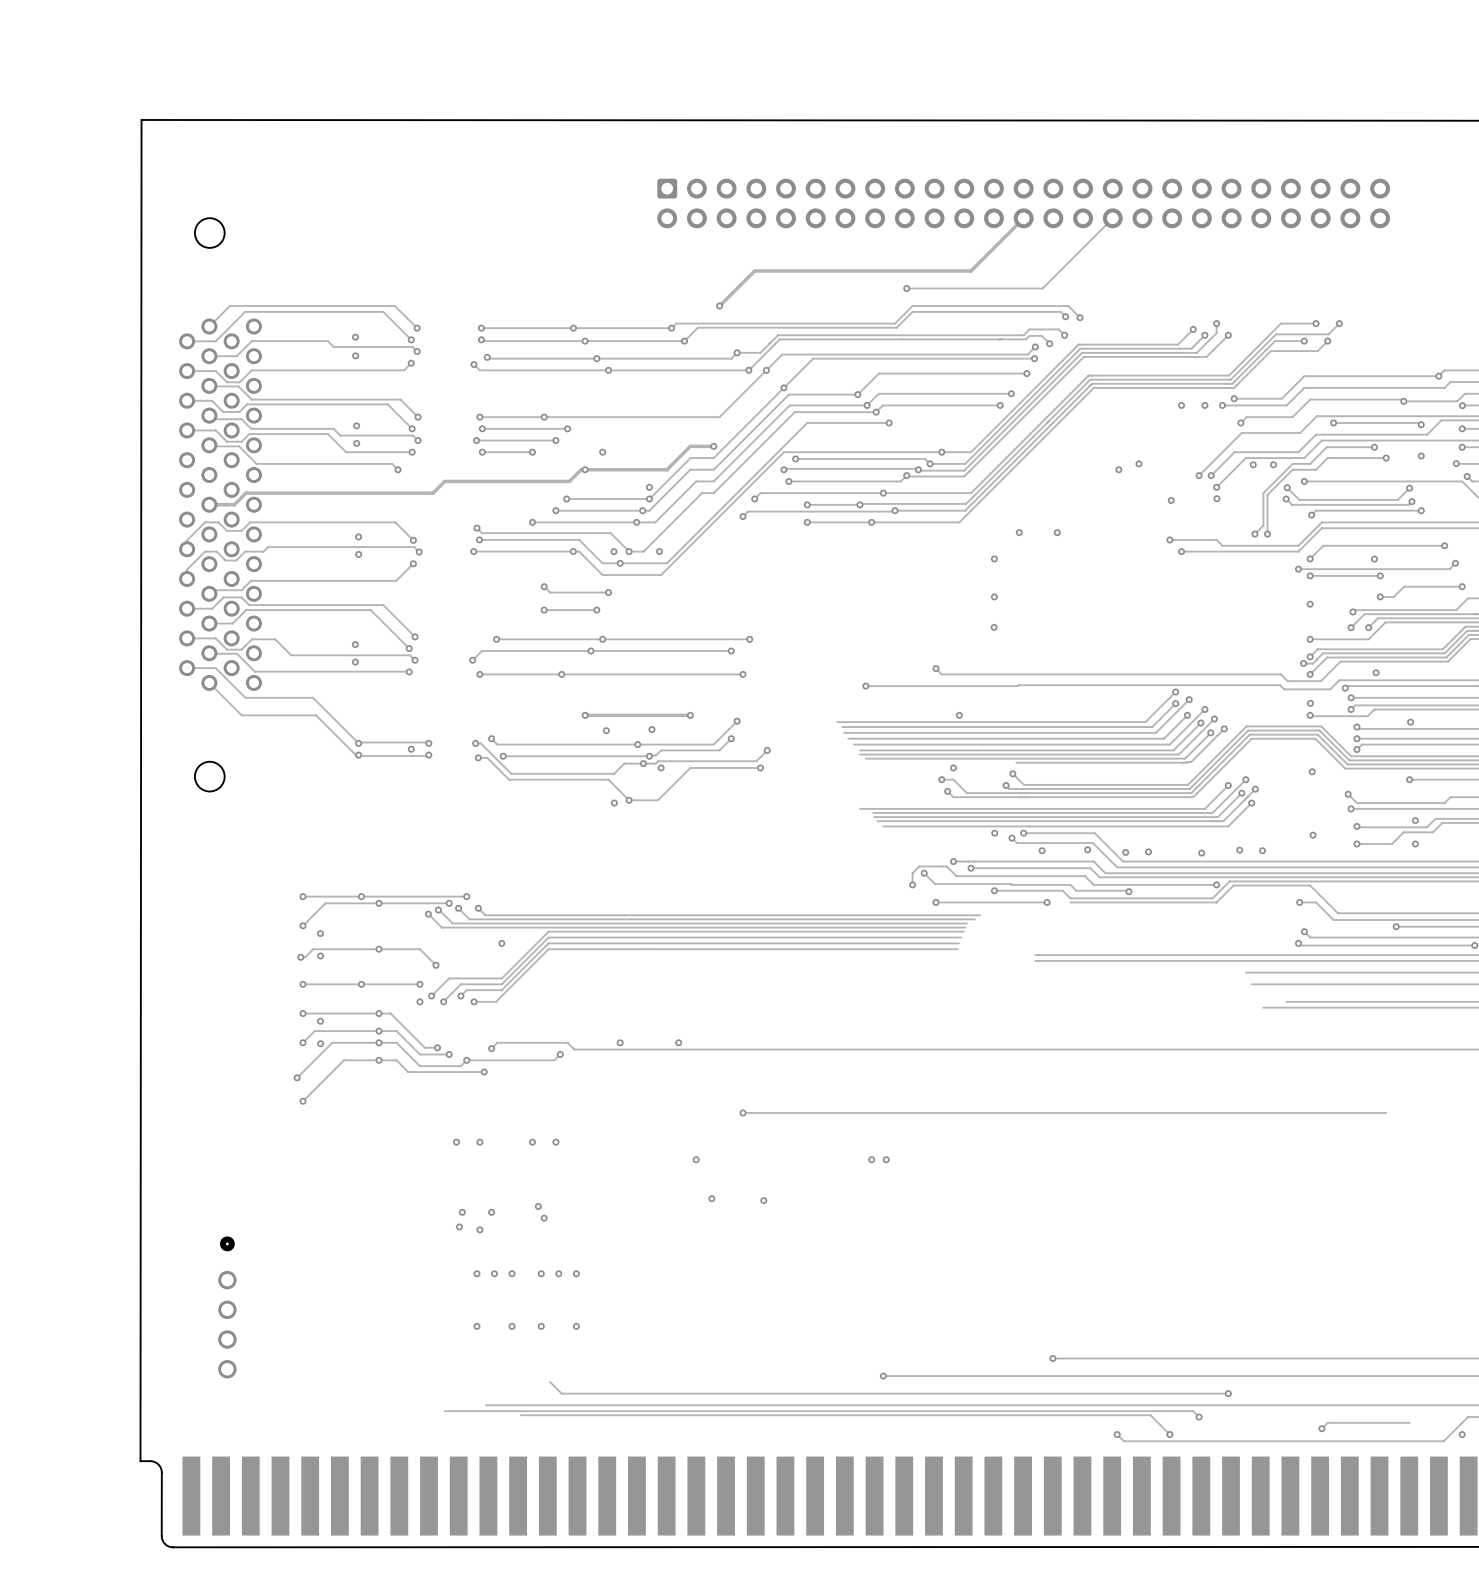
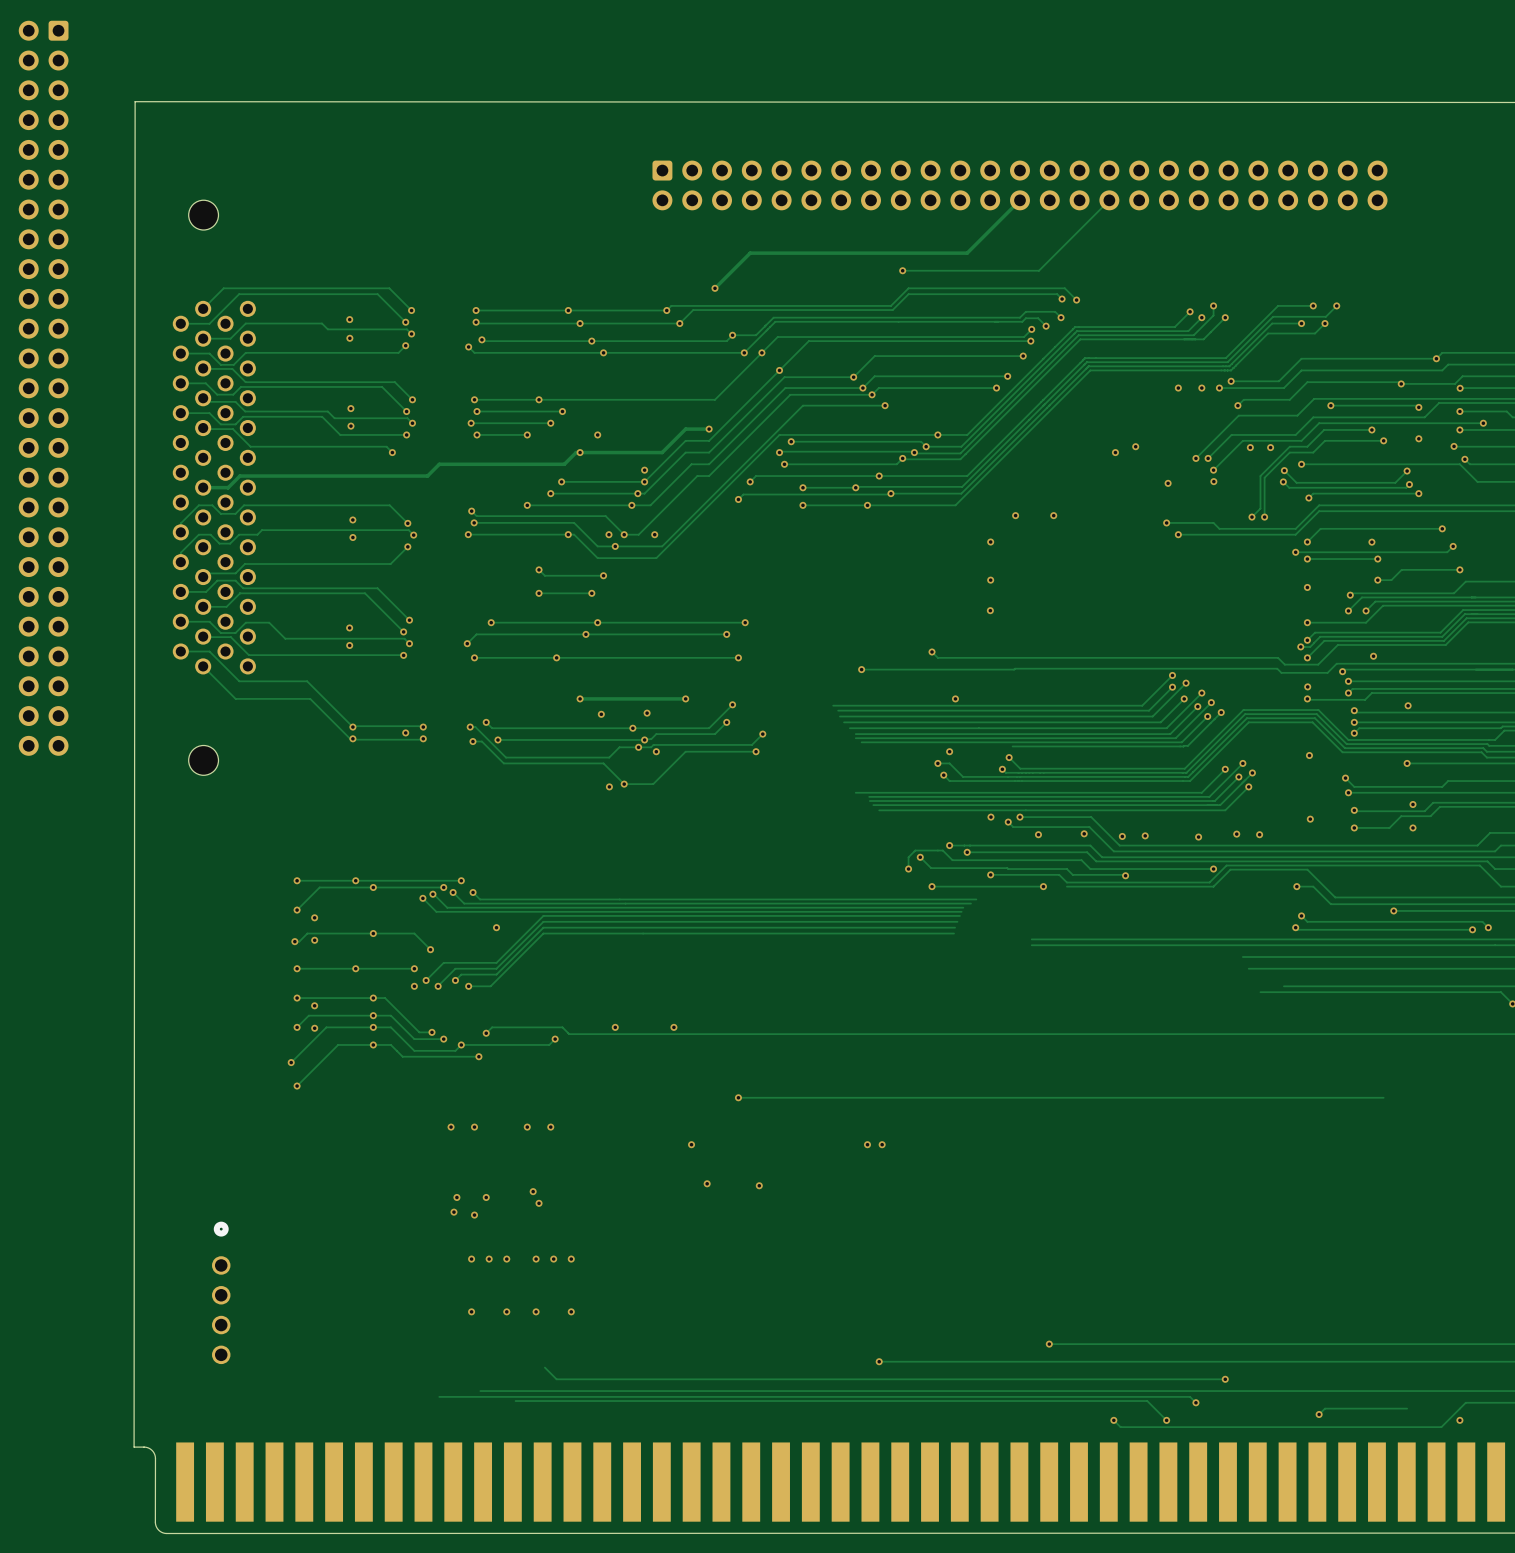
part: none -> (43, 388)

